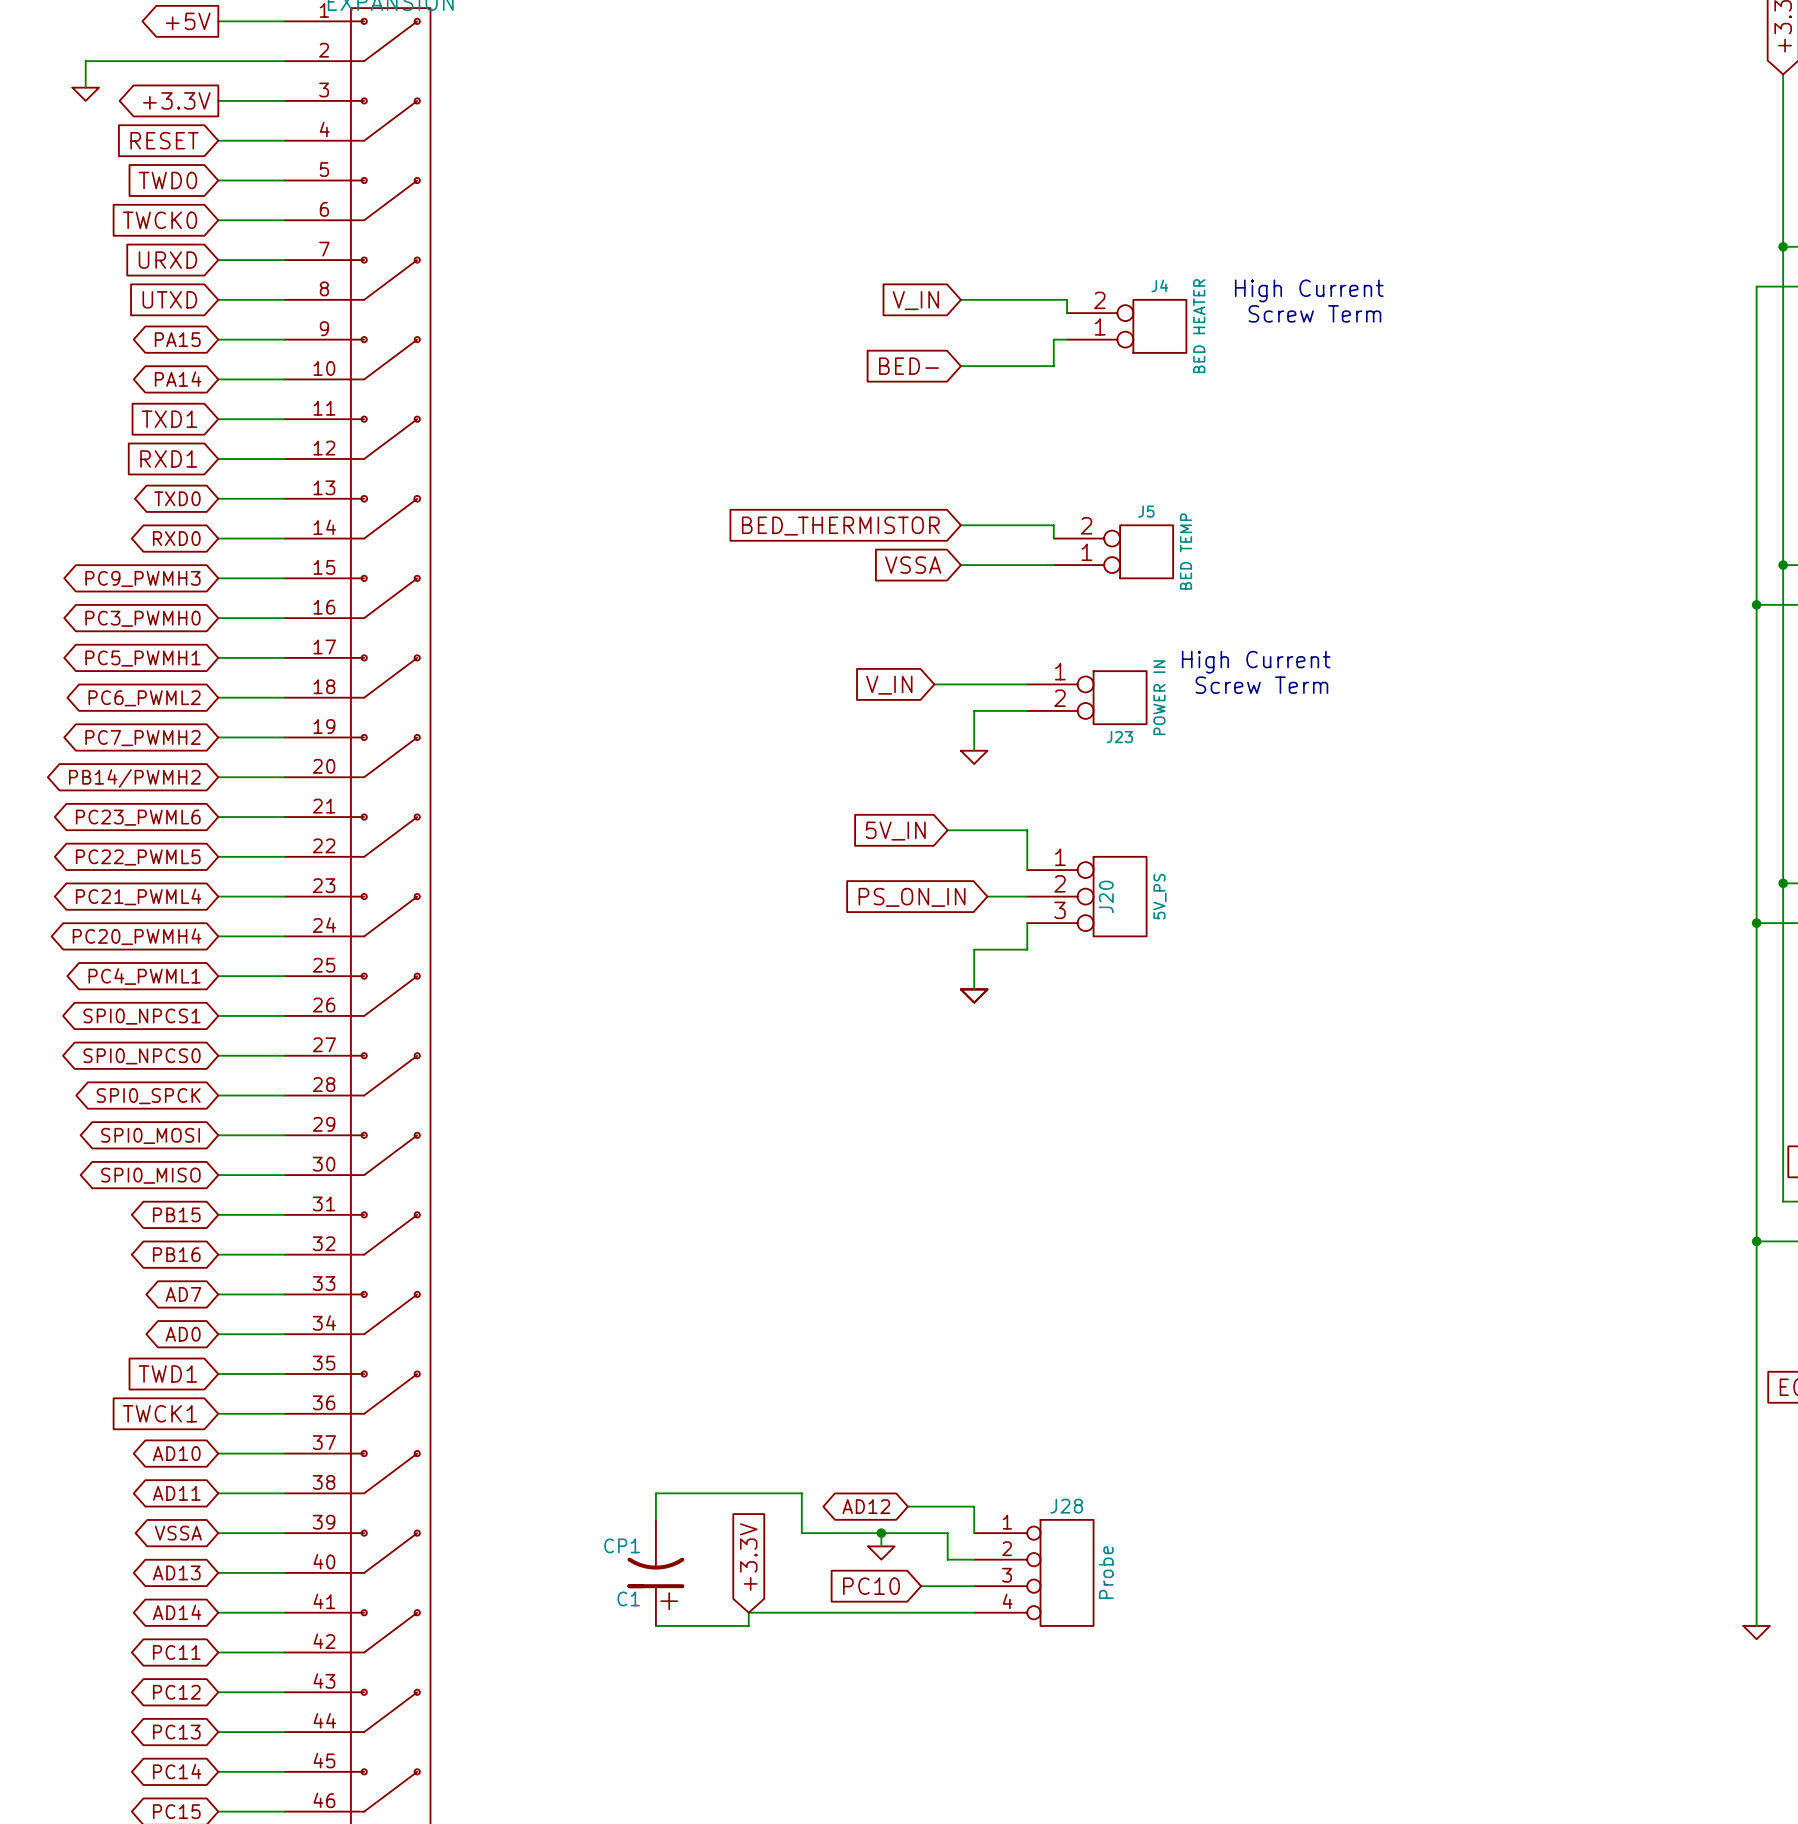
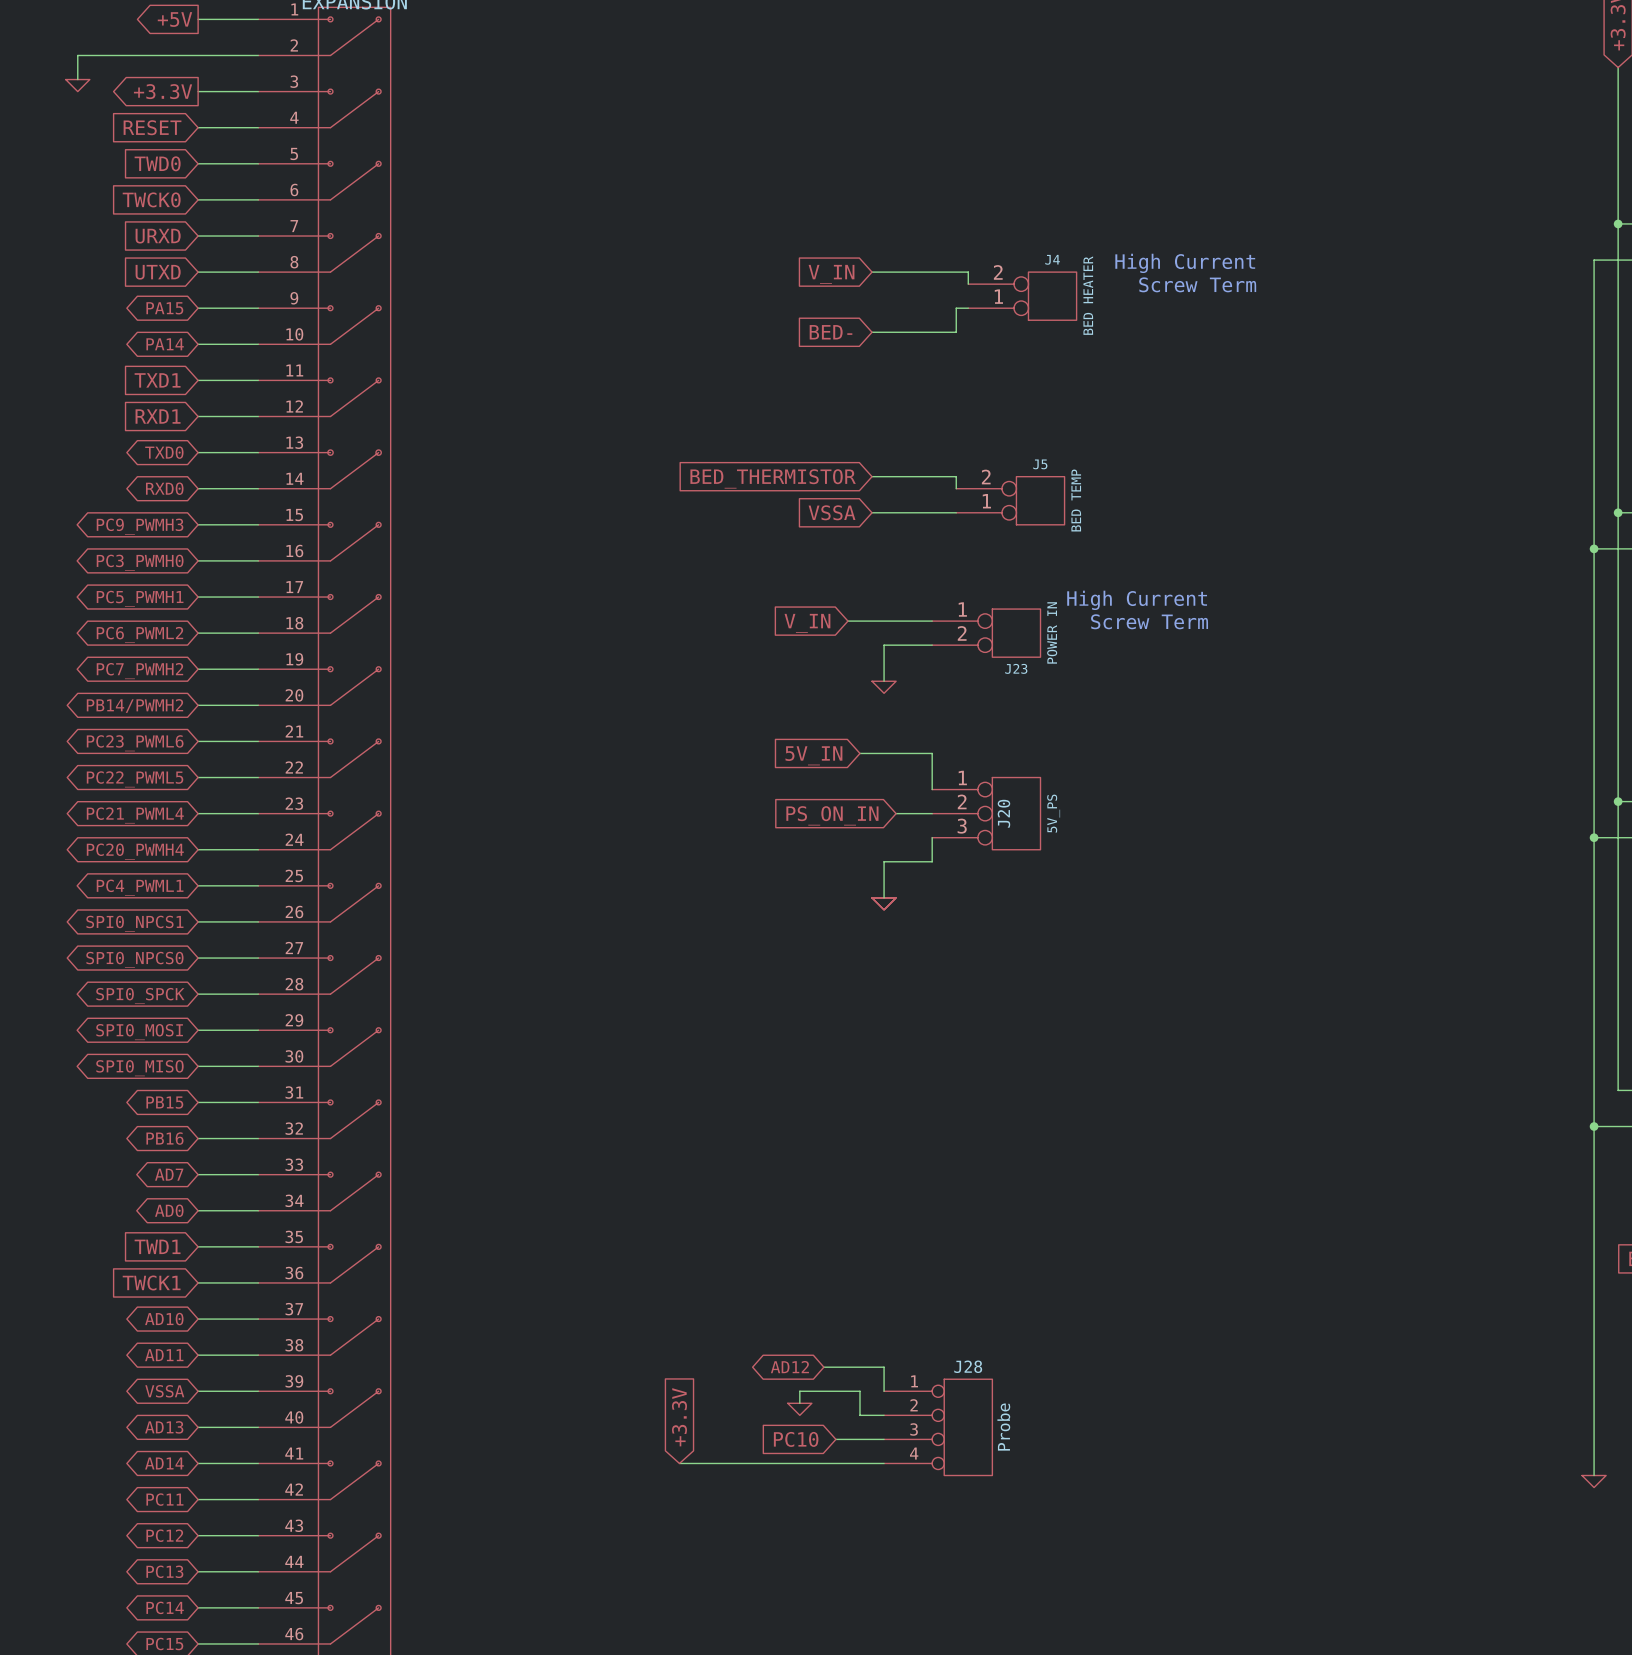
wire: (655, 1519) (655, 1493) (801, 1493) (801, 1533) (881, 1533) -> none
junction: (881, 1533) -> none
C1: CP1 (655, 1572) -> none
wire: (748, 1612) (748, 1625) (655, 1625) -> none

